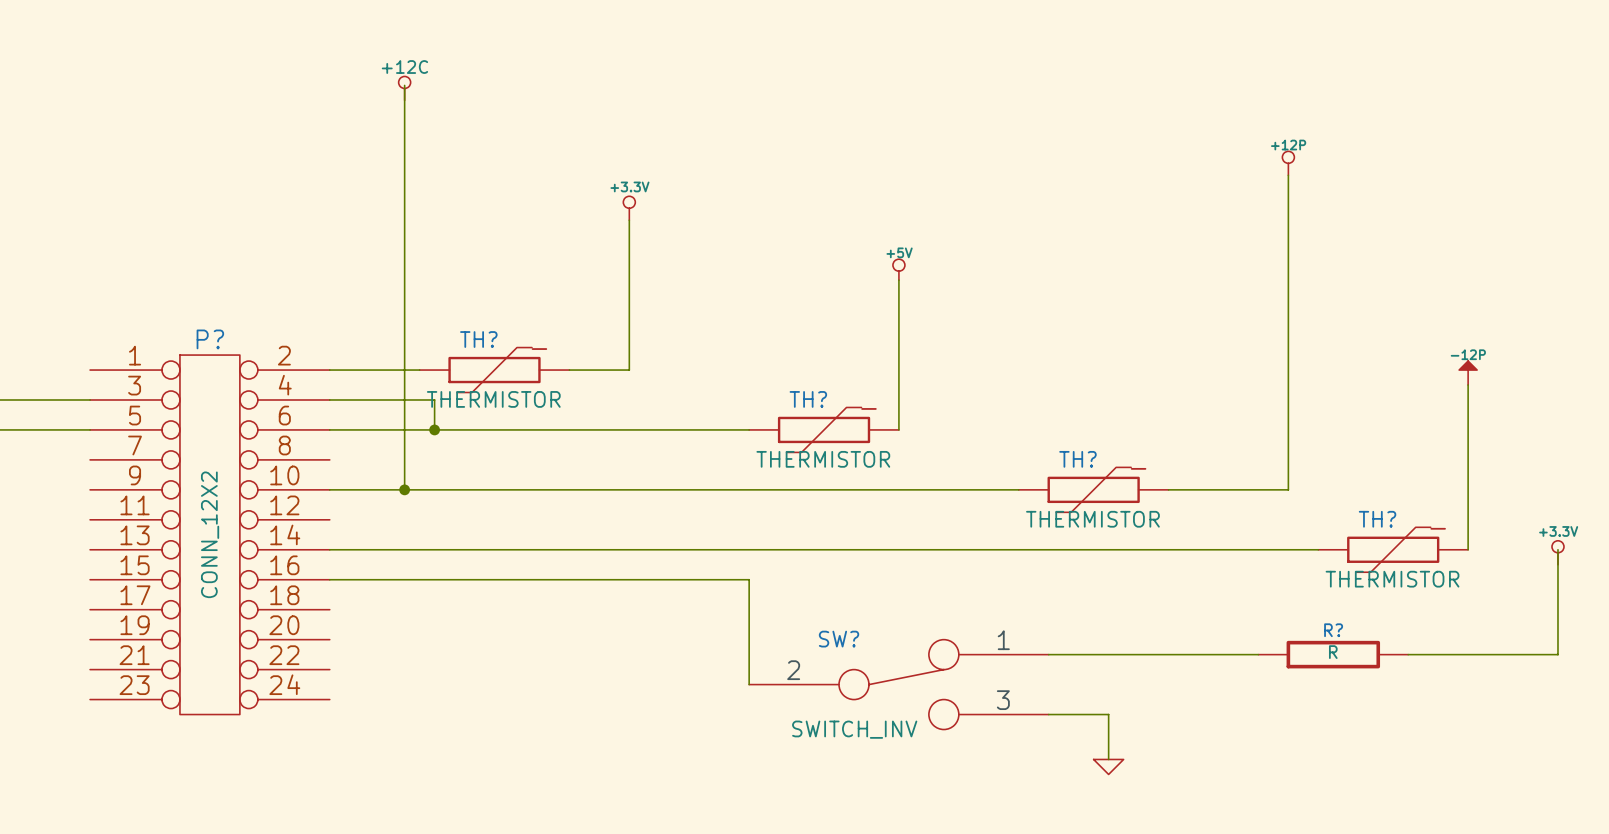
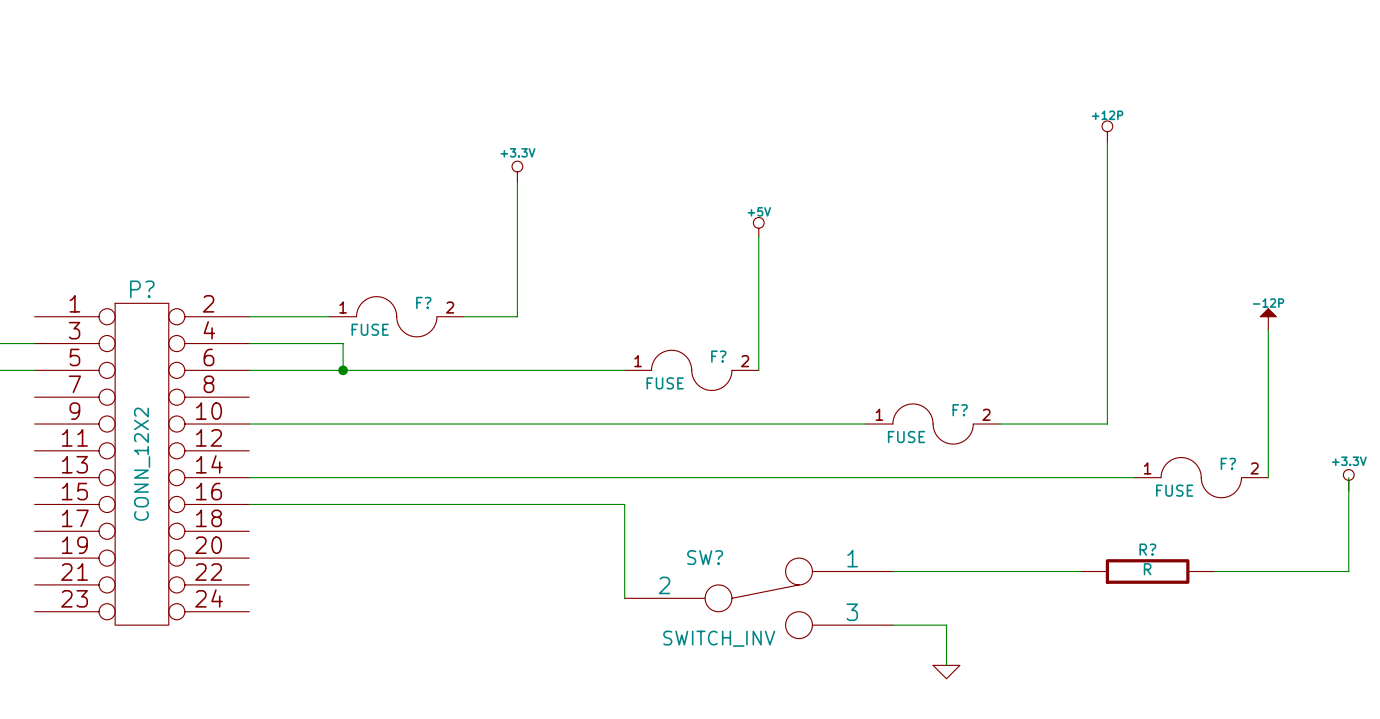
wire: (404, 85) (404, 489) -> none
power symbol: +12C (404, 88) -> none
TH?: THERMISTOR (494, 370) -> none
F?: none -> FUSE (396, 316)
TH?: THERMISTOR (824, 429) -> none
F?: none -> FUSE (691, 370)
junction: (404, 489) -> none
TH?: THERMISTOR (1093, 489) -> none
F?: none -> FUSE (933, 424)
TH?: THERMISTOR (1393, 549) -> none
F?: none -> FUSE (1201, 477)

